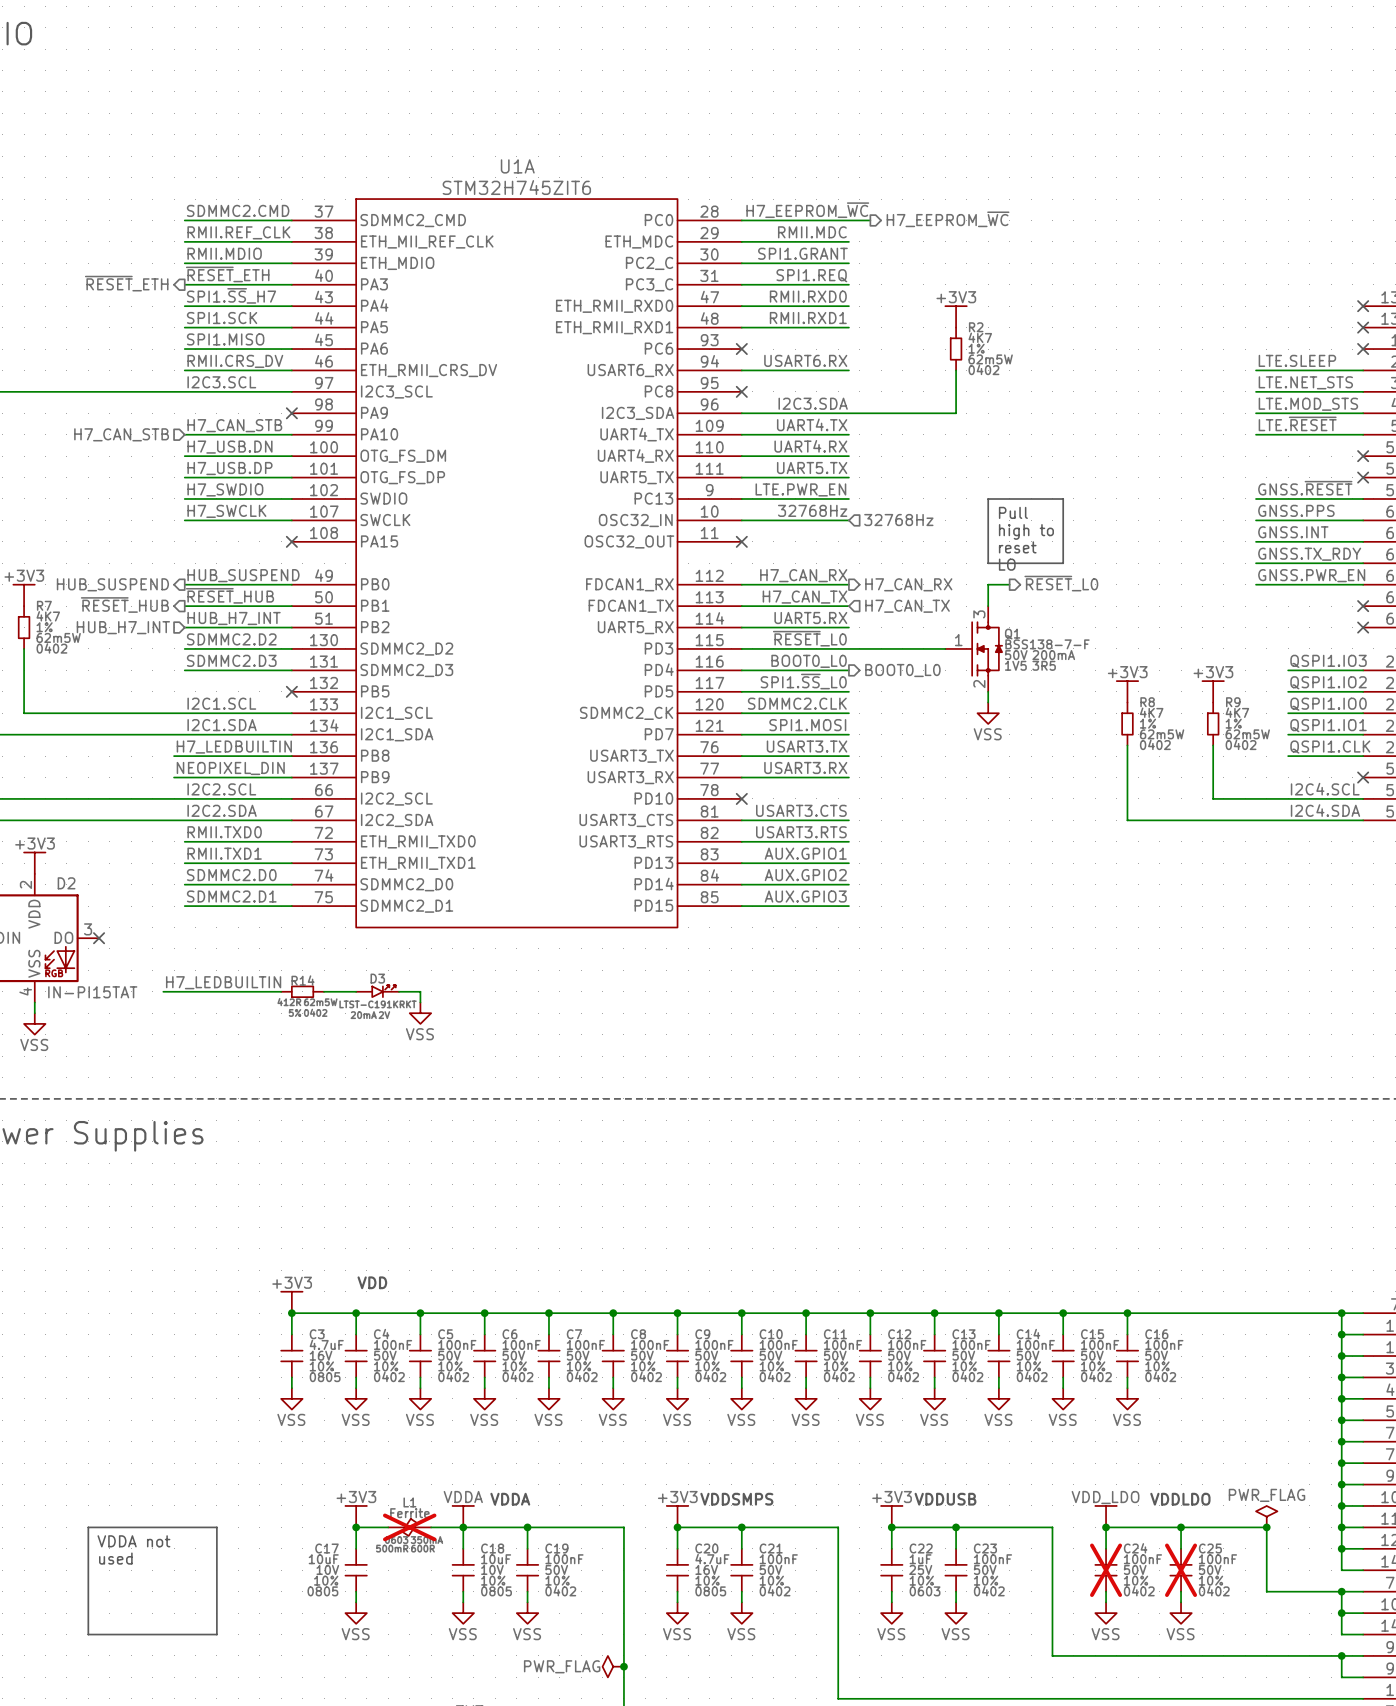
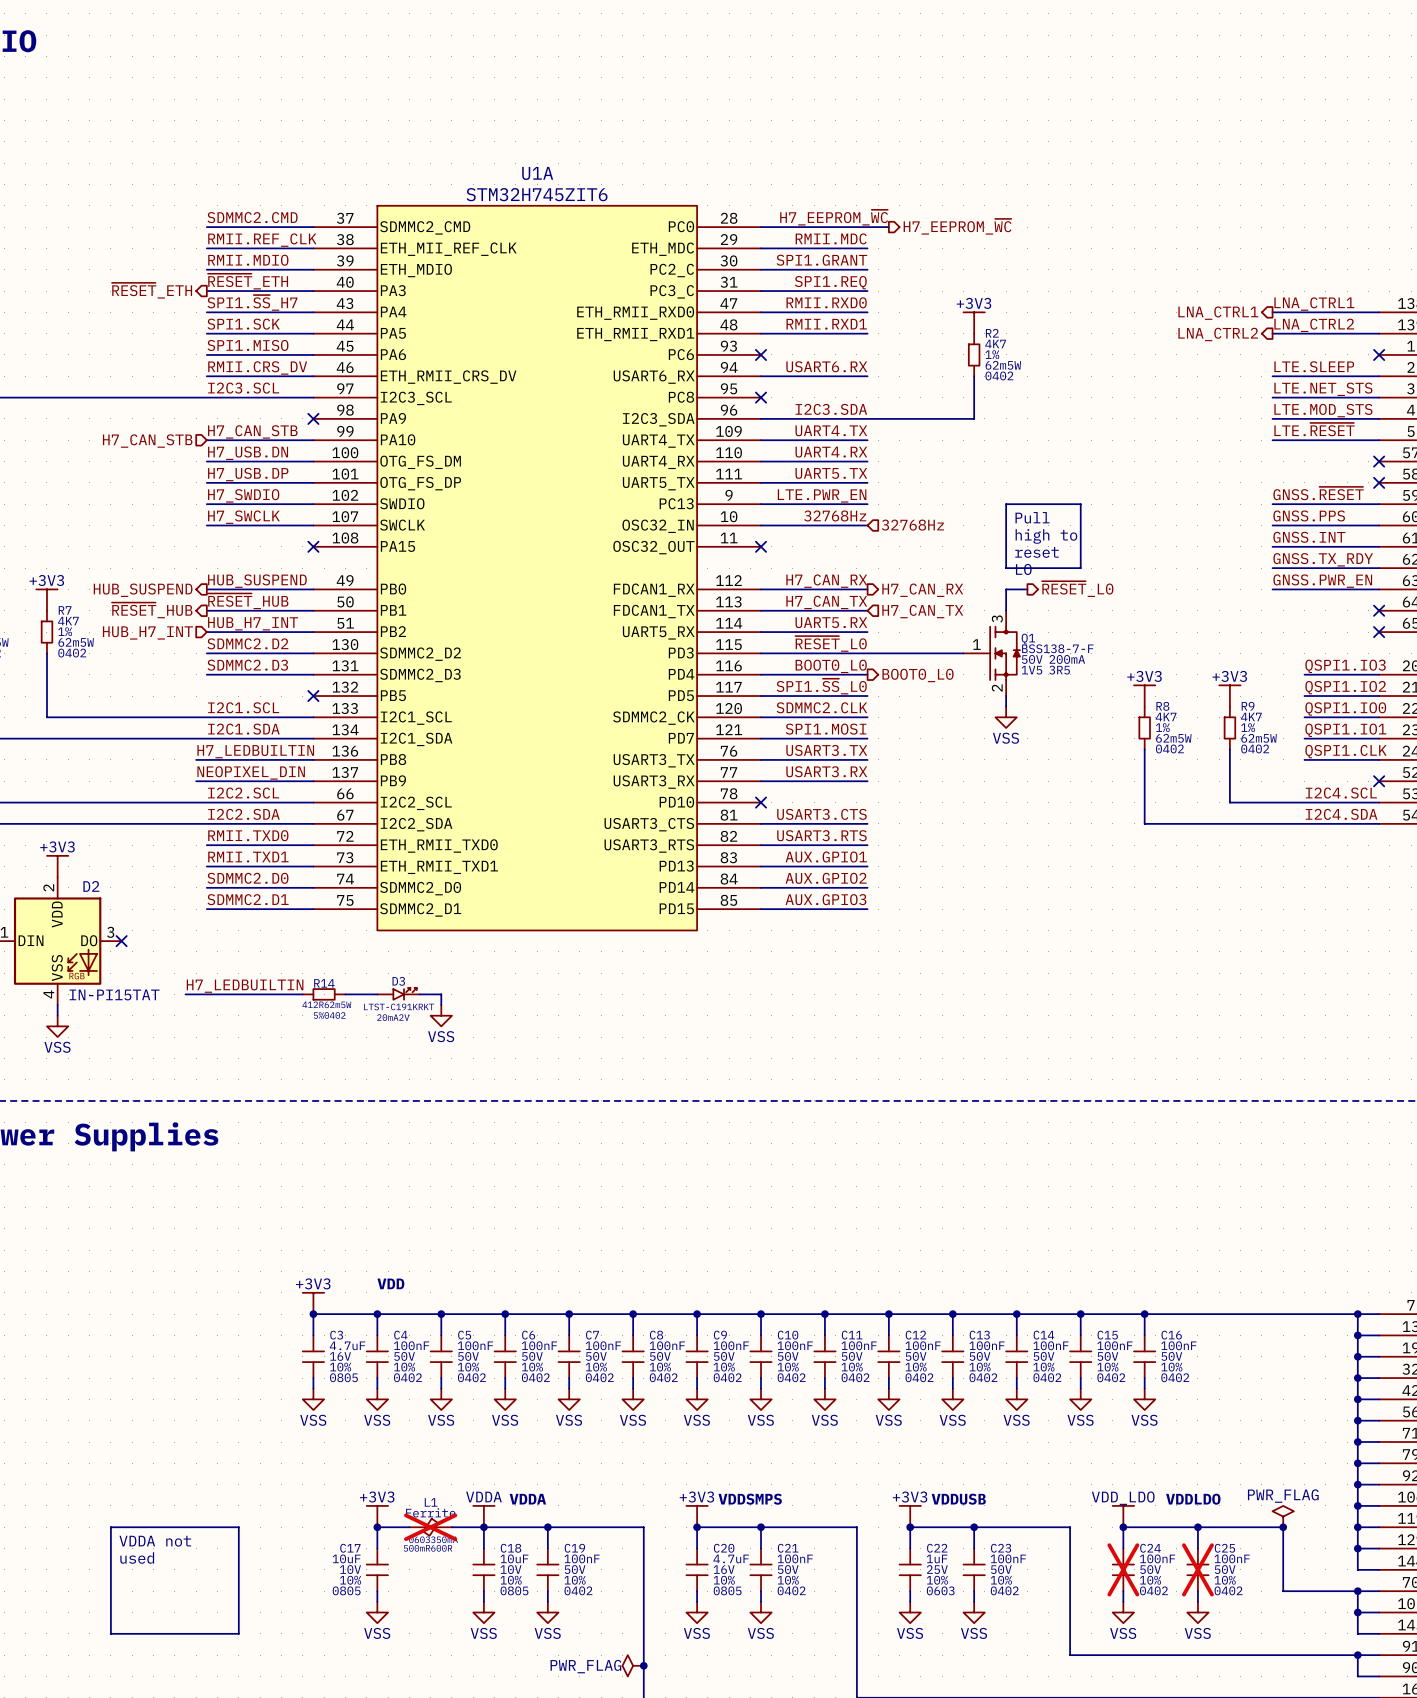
label: none -> LNA_CTRL1 (1314, 304)
hierarchical label: none -> LNA_CTRL1 (1218, 313)
wire: none -> (1272, 312) (1379, 312)
no-connect mark: (1363, 306) -> none
label: none -> LNA_CTRL2 (1314, 325)
hierarchical label: none -> LNA_CTRL2 (1218, 334)
wire: none -> (1272, 333) (1379, 333)
no-connect mark: (1363, 327) -> none

